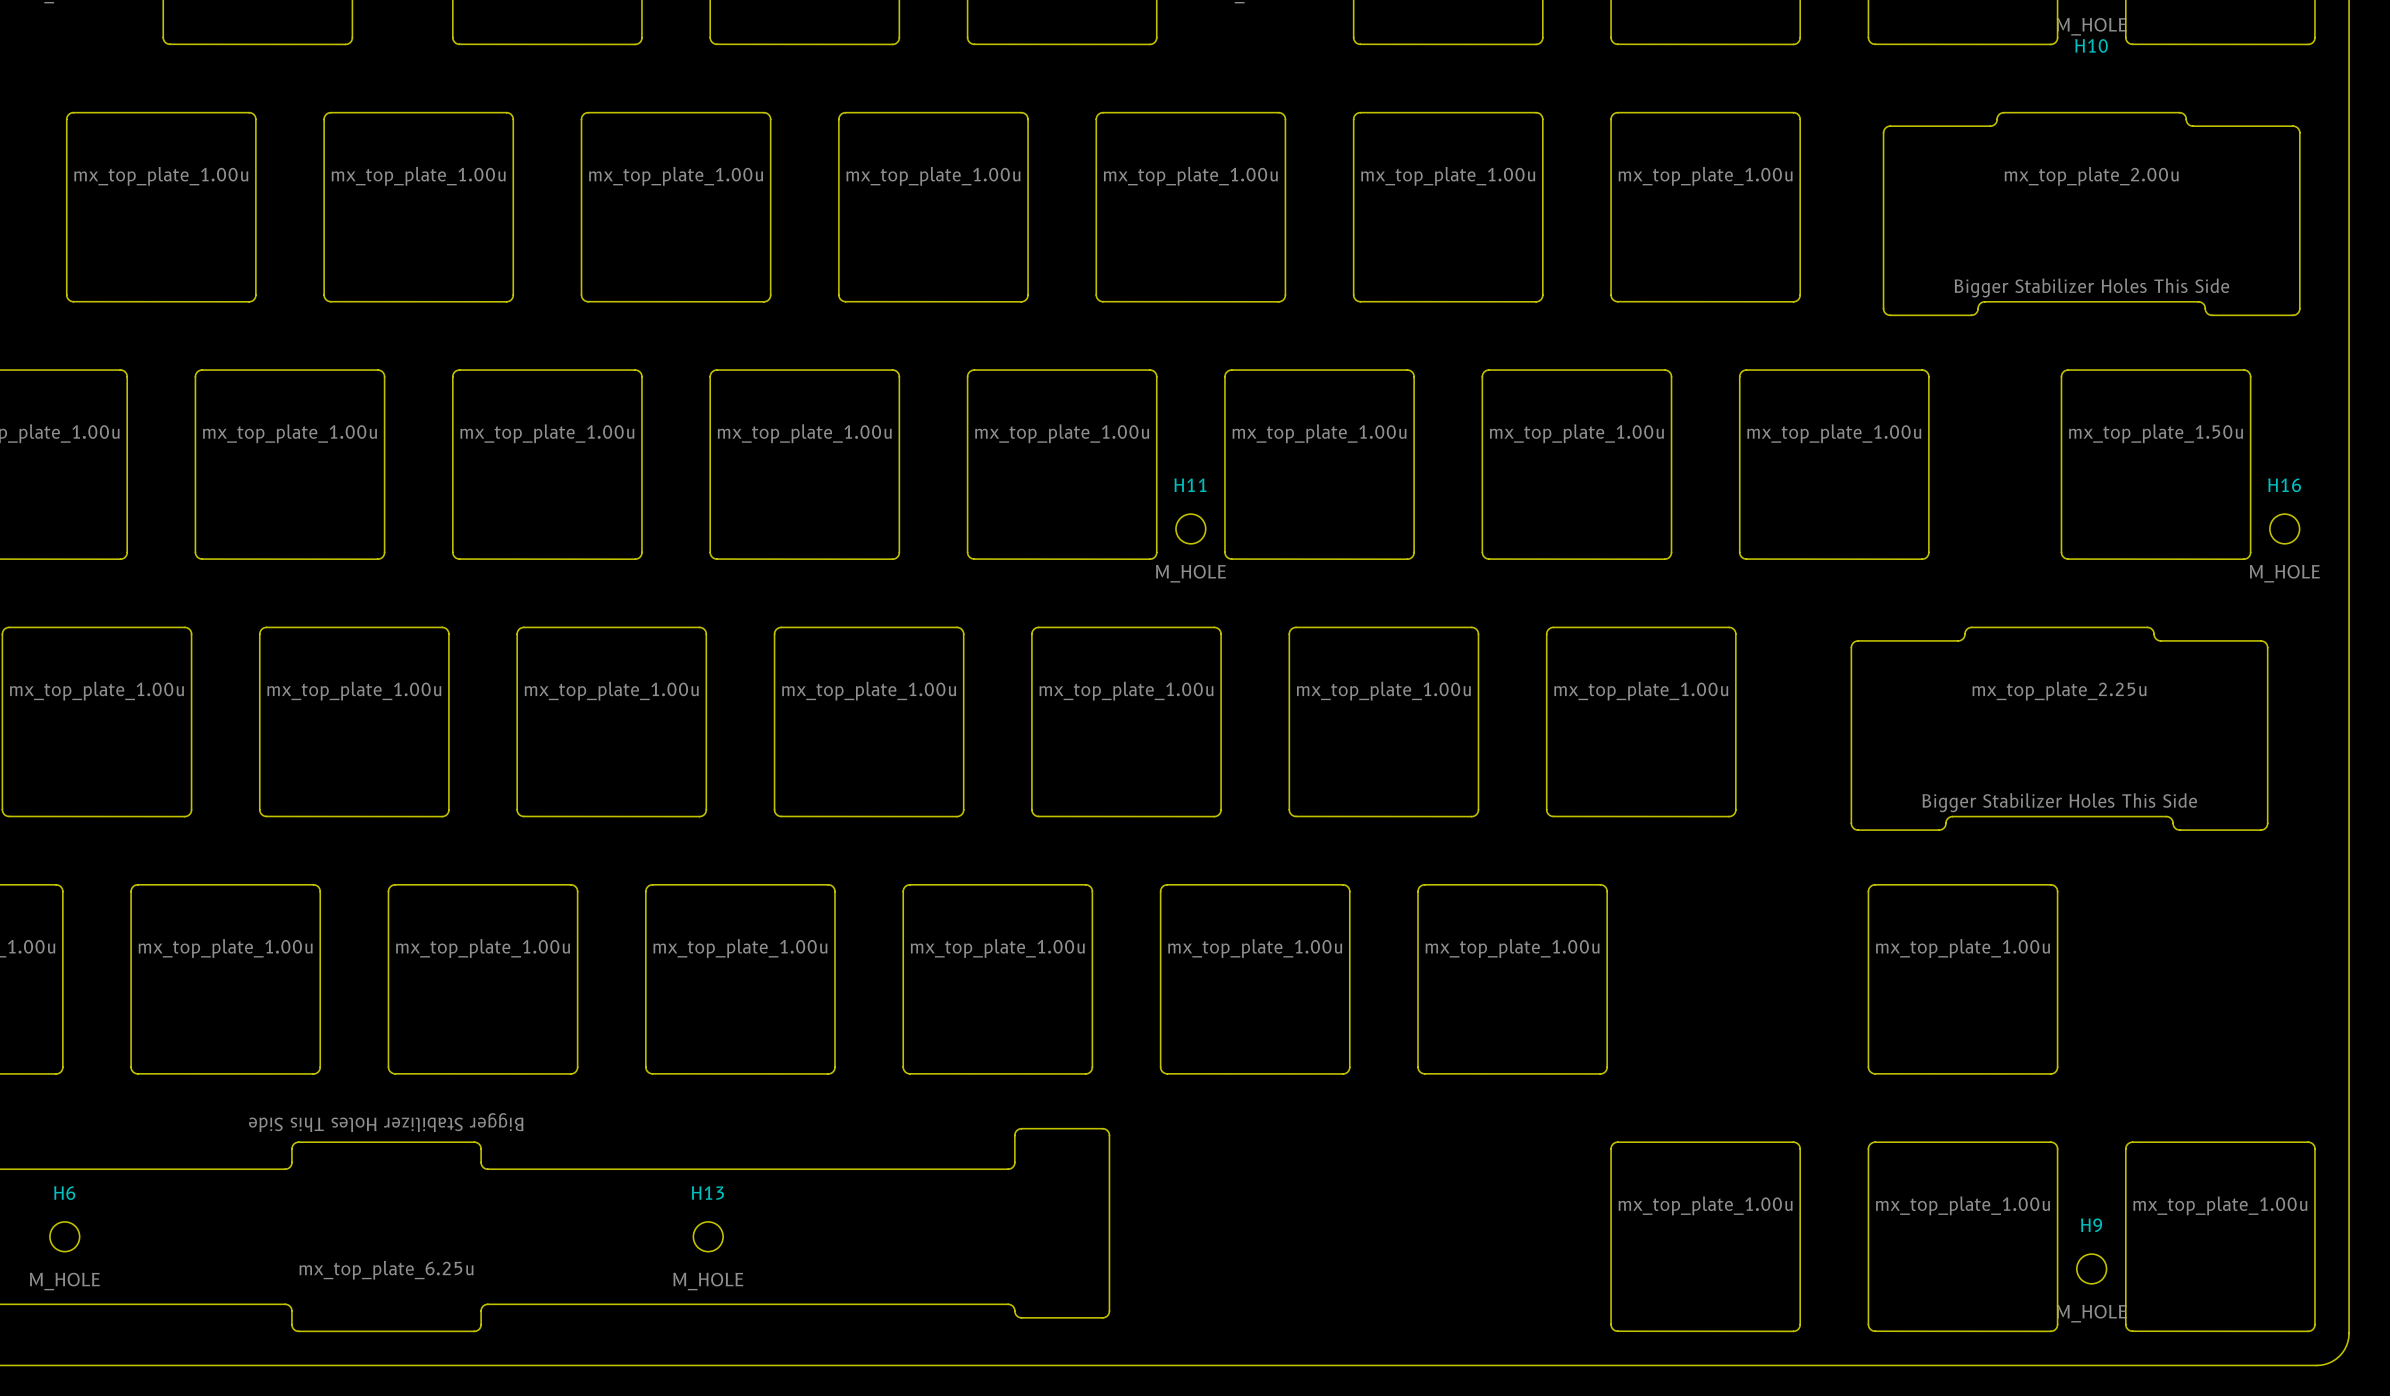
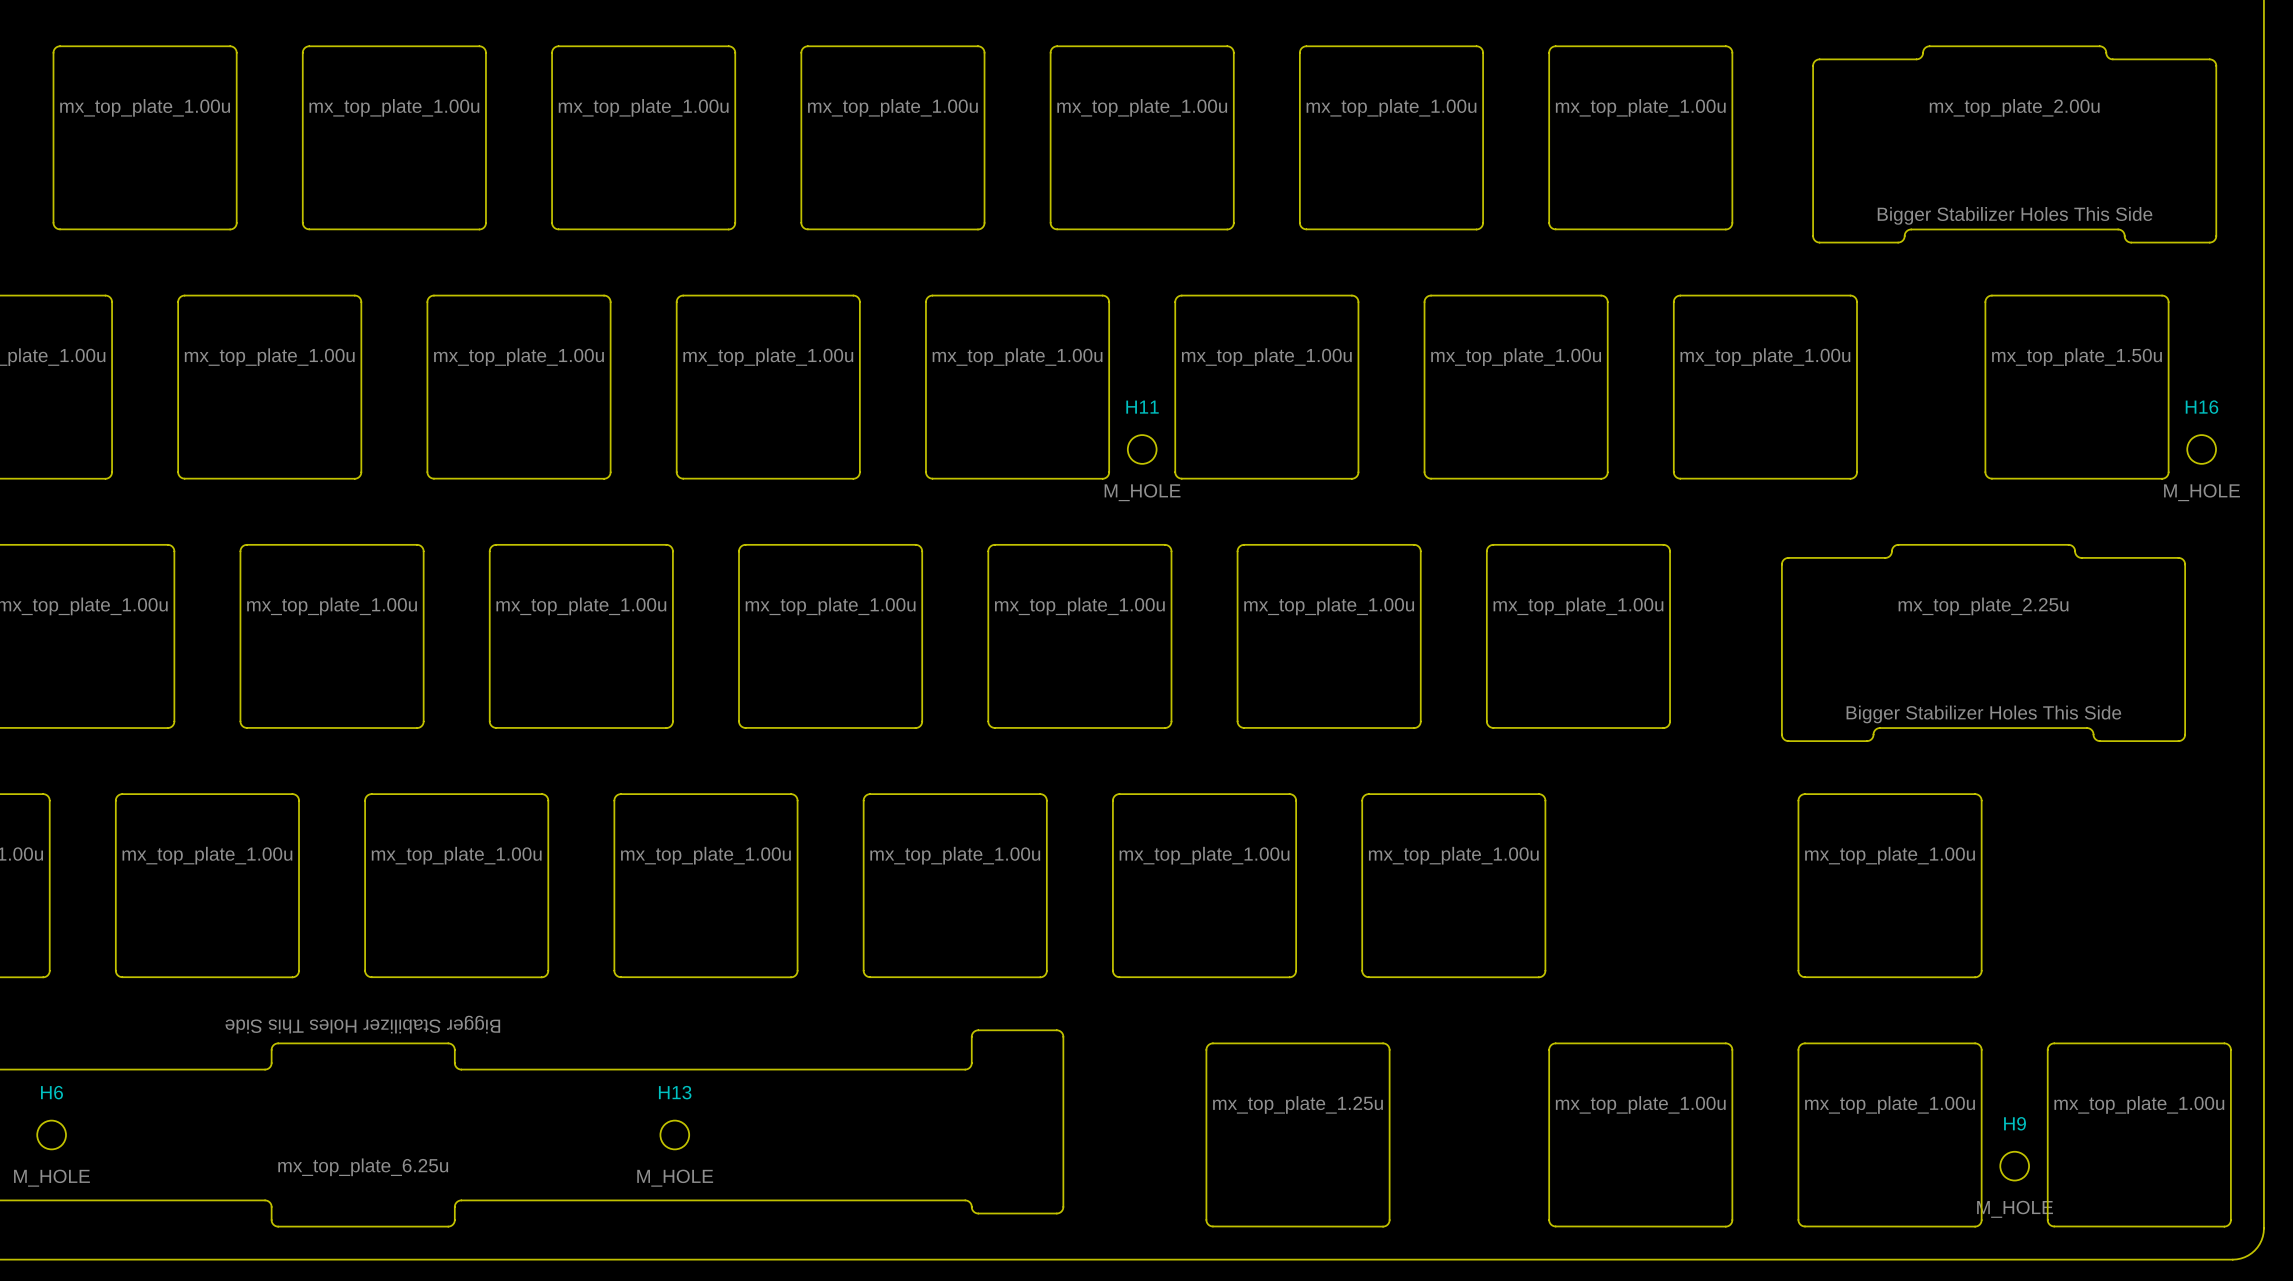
drawing: none -> [1205, 1042, 1391, 1228]

